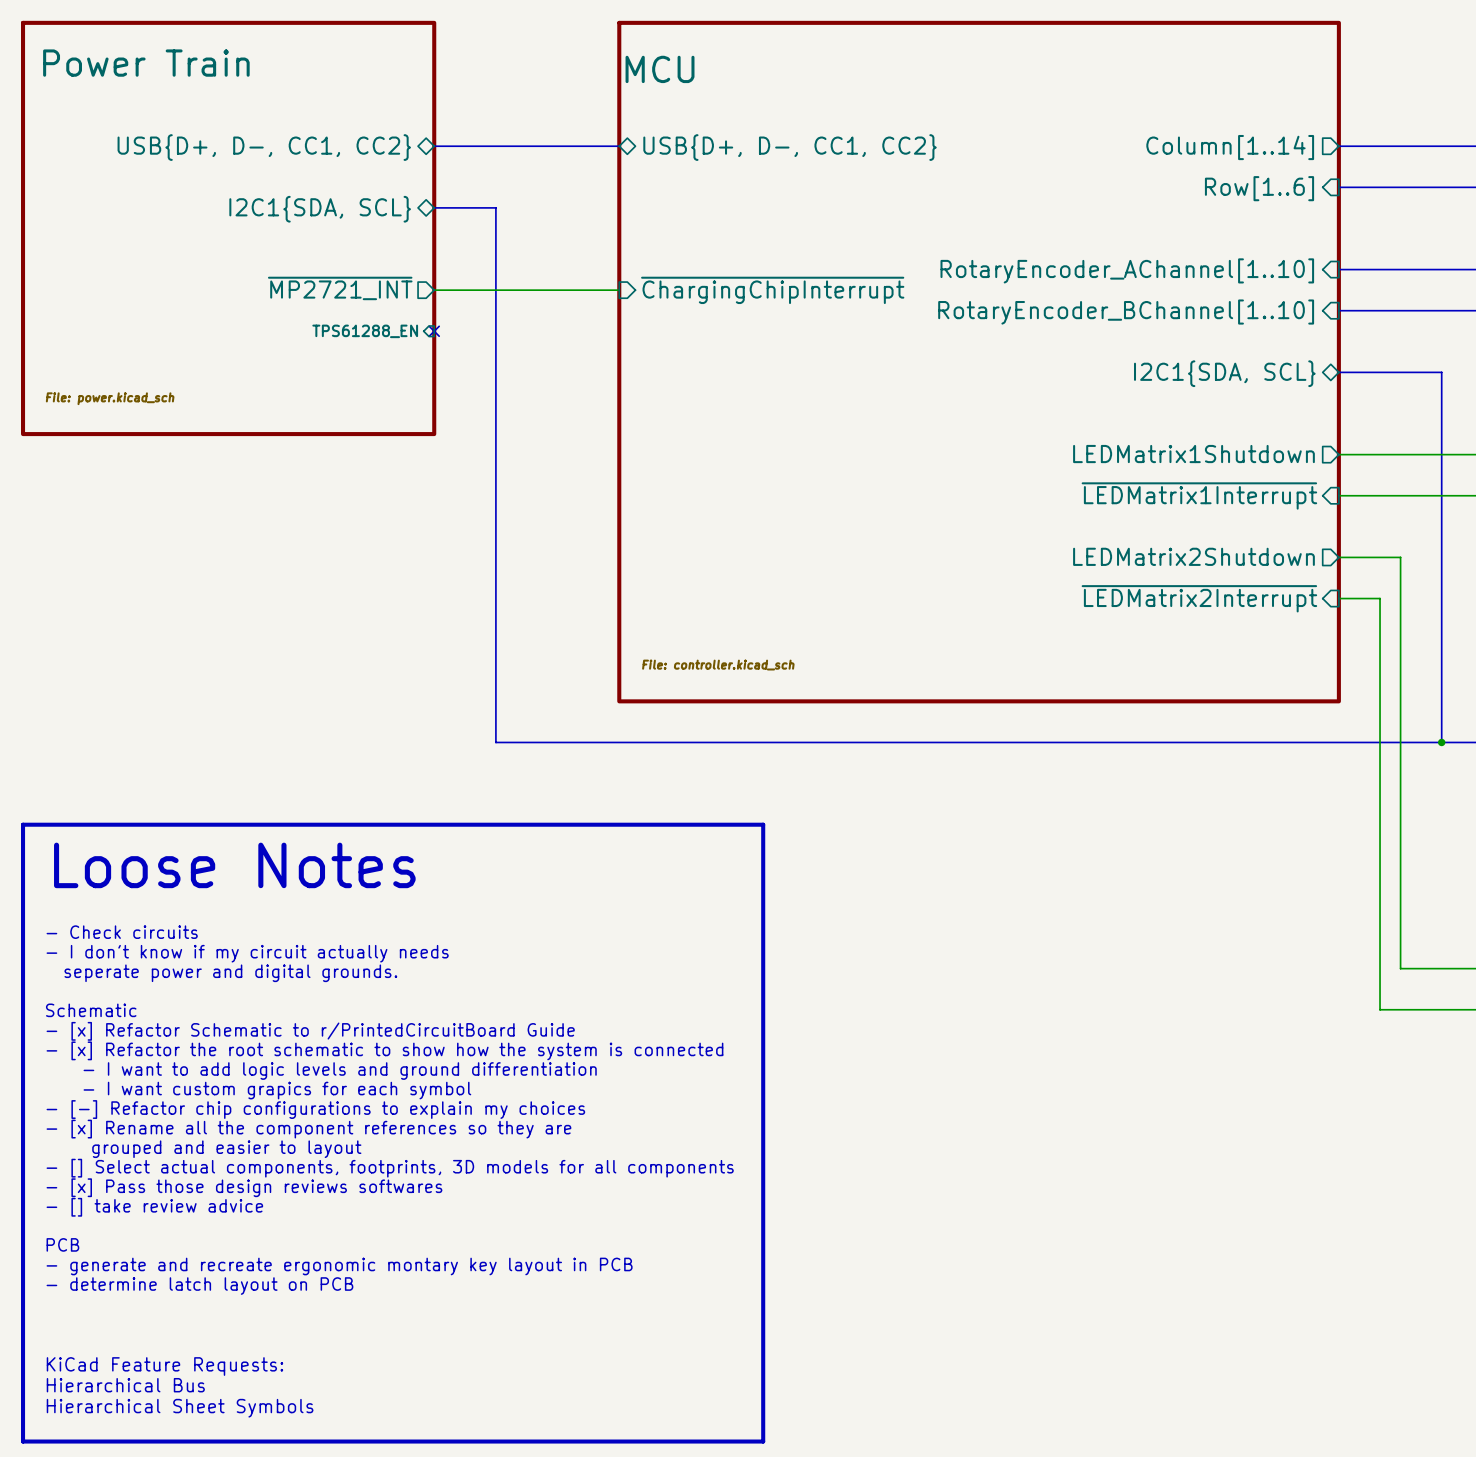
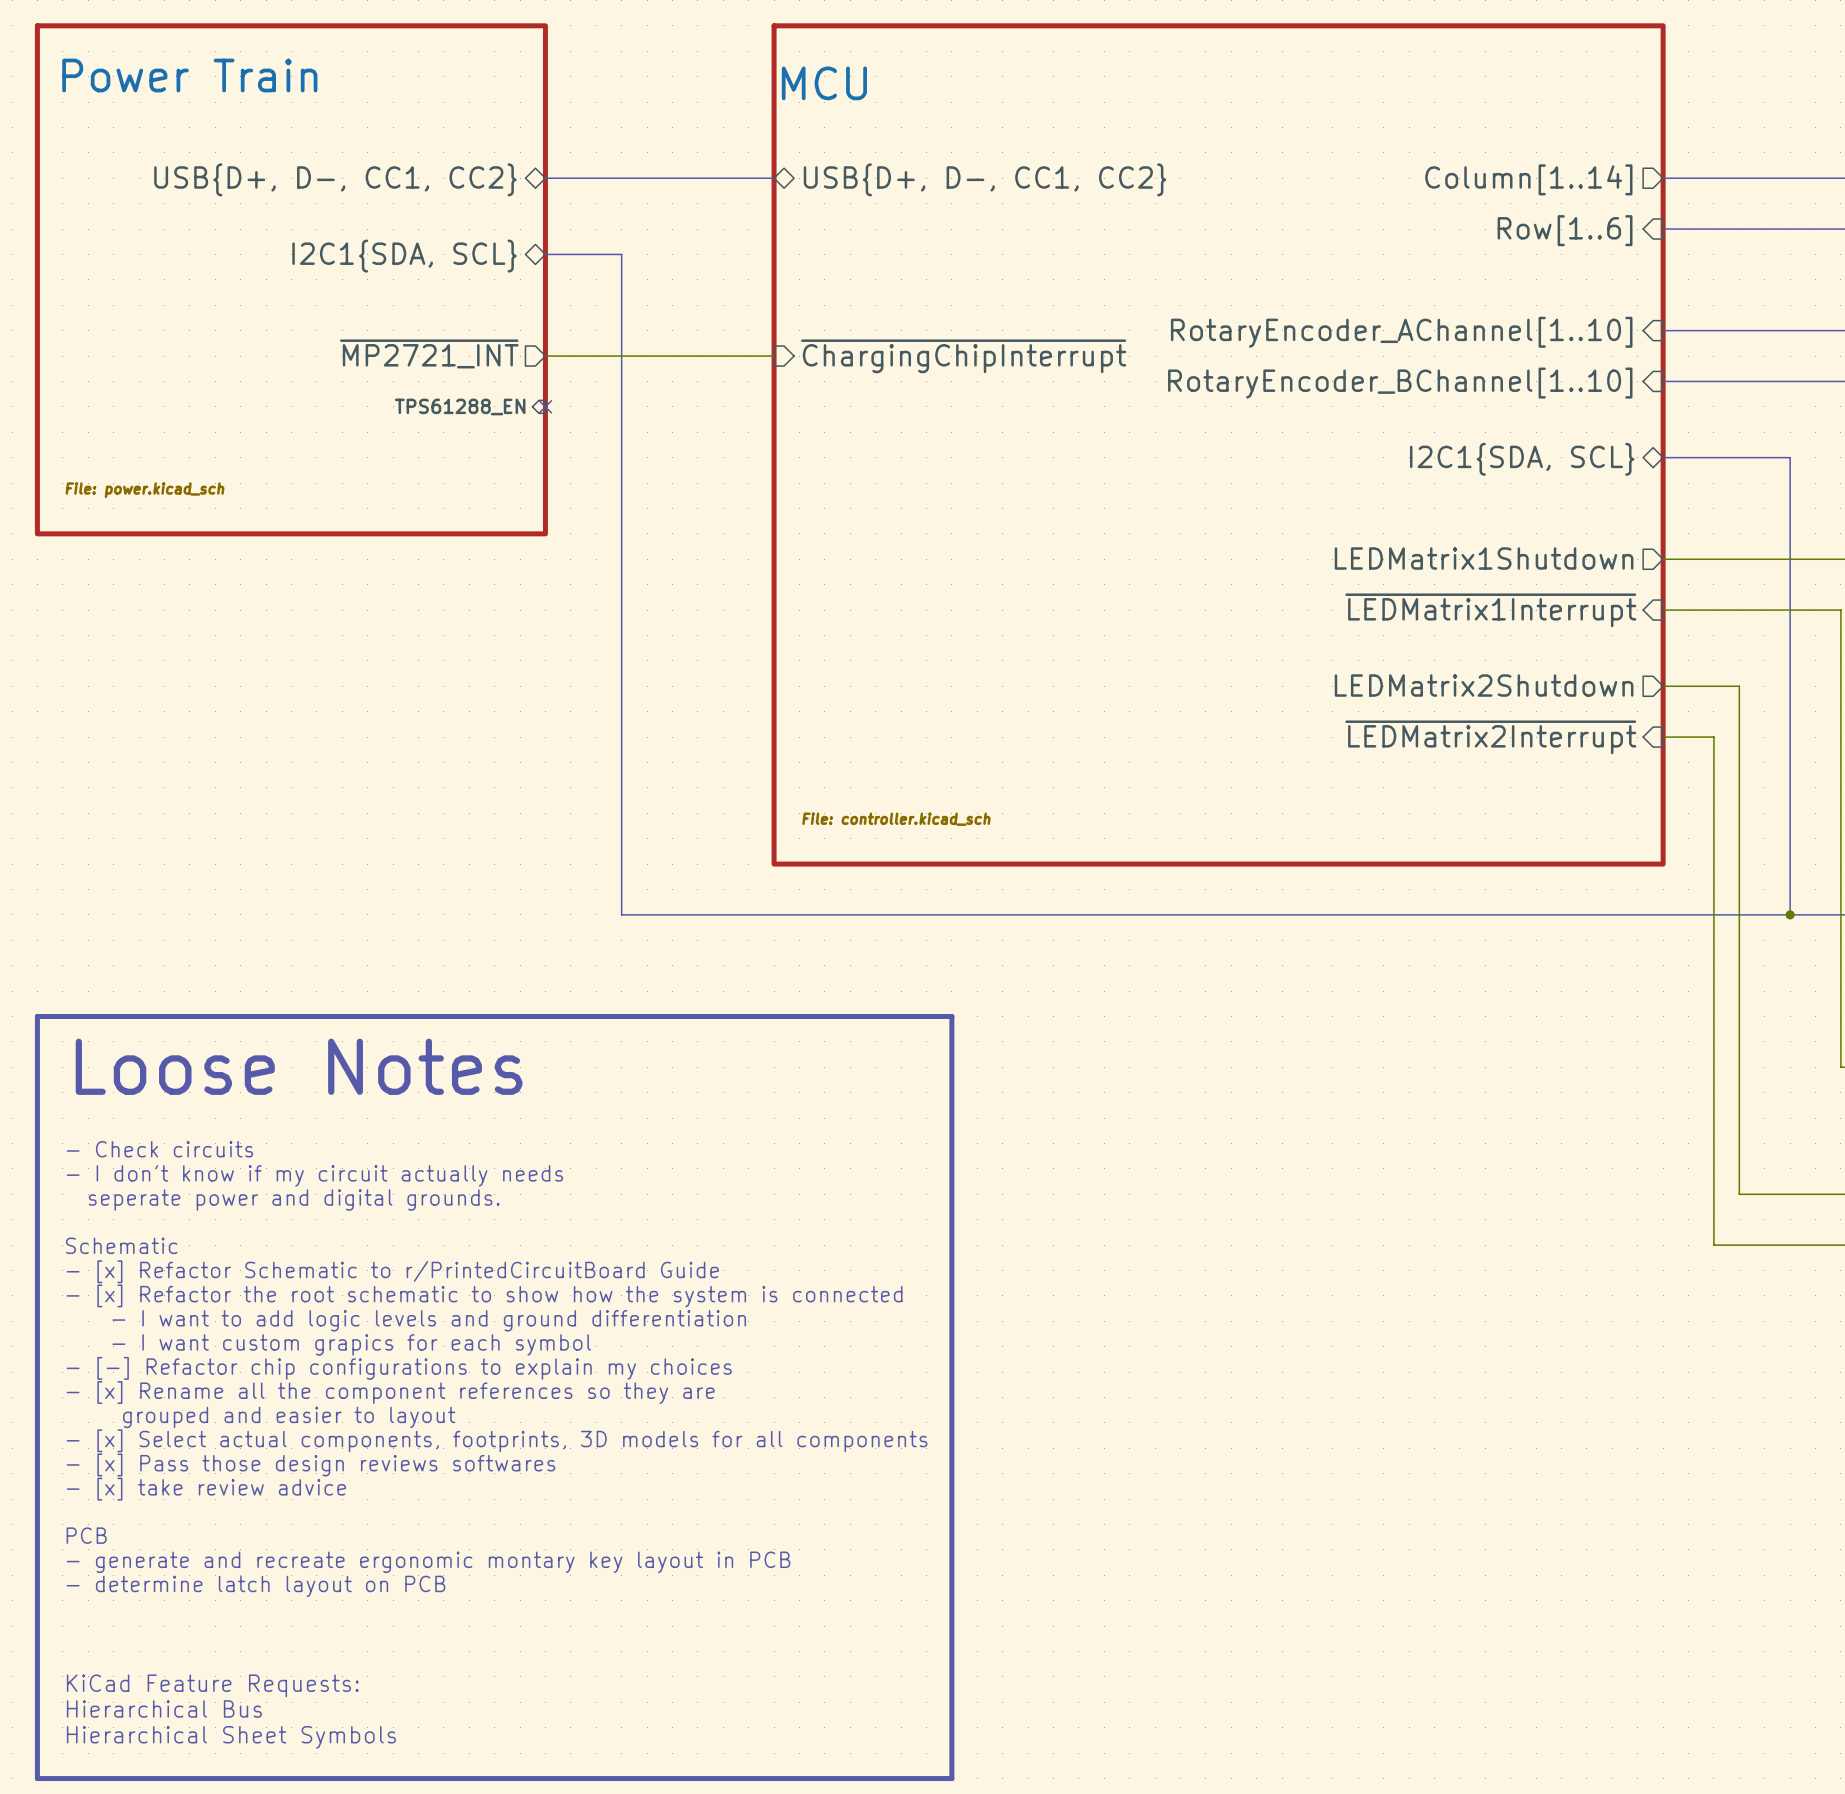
text: - [] Select actual components, footprints, 3D models for all components (390, 1168) -> - [x] Select actual components, footprints, 3D models for all components (497, 1440)
text: - [] take review advice (154, 1207) -> - [x] take review advice (206, 1489)

